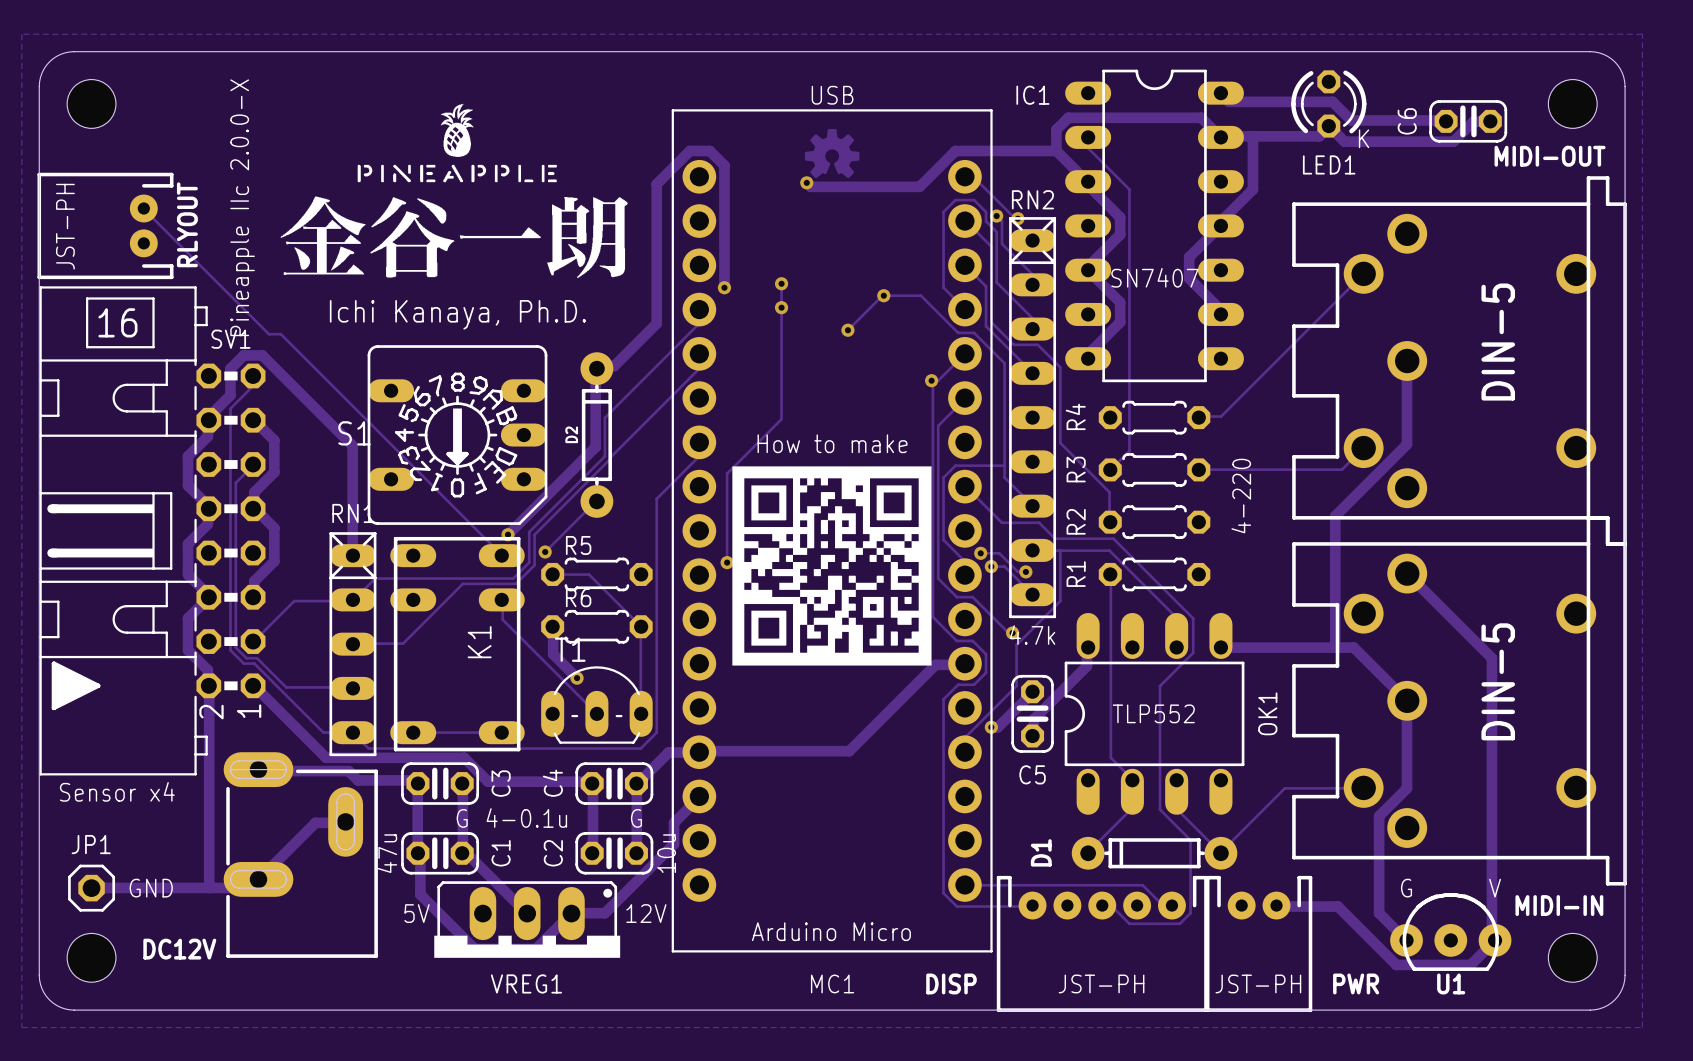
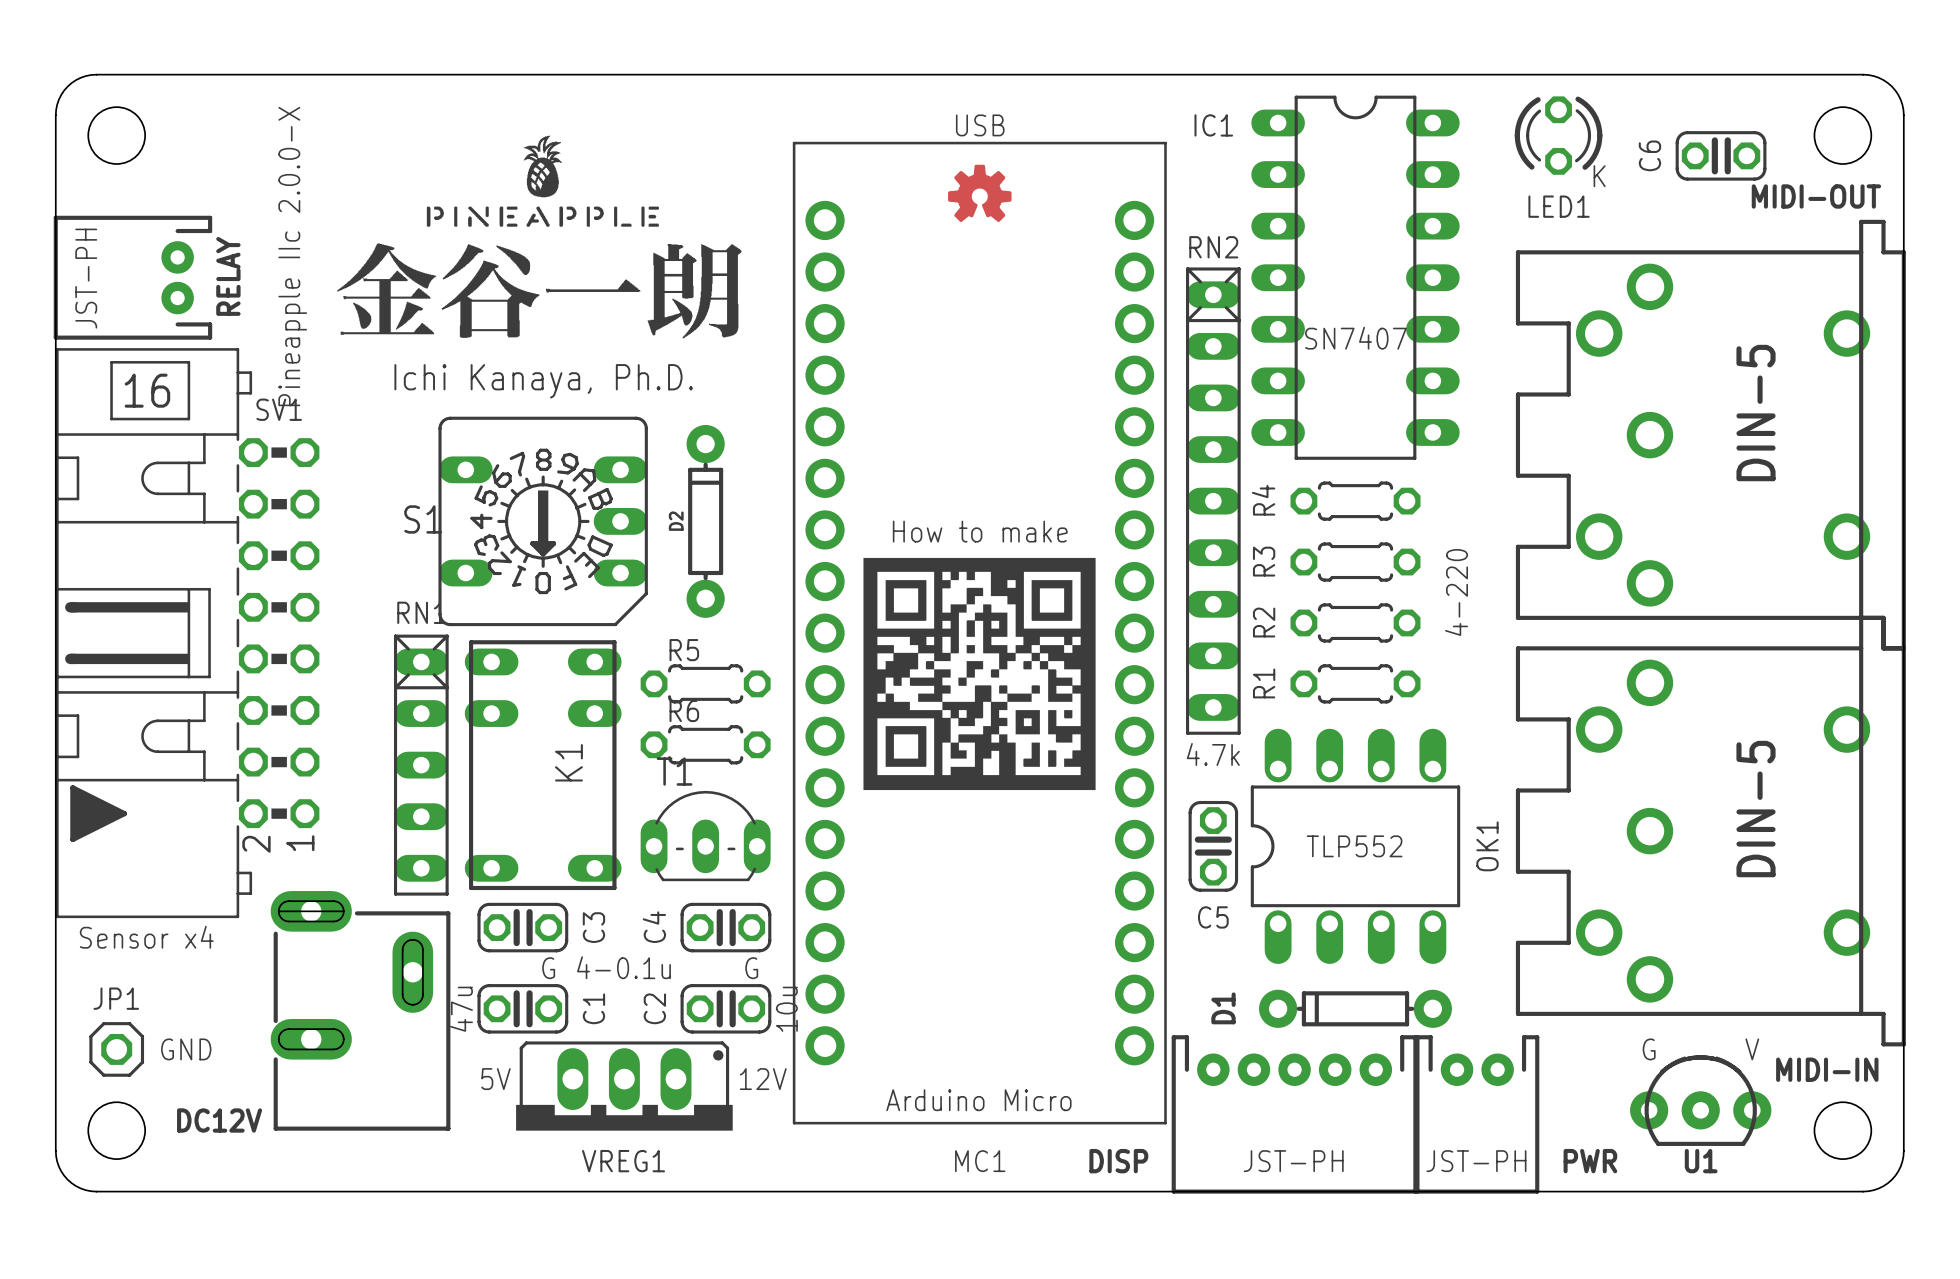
zone outline: (21, 34) (1642, 34) (1642, 1027) (21, 1027) (21, 34) -> none
track: (1220, 93) (1229, 101) (1332, 101) (1351, 120) (1446, 121) -> none
track: (1490, 121) (1473, 121) (1453, 141) (1344, 141) (1328, 126) (1319, 136) (1220, 137) (1201, 117) (1068, 117) (1056, 129) (1056, 150) -> none
track: (1252, 136) (1252, 189) (1223, 218) (1220, 225) (1189, 257) (1189, 278) (1219, 308) (1220, 314) -> none
track: (1088, 137) (1088, 148) (1129, 189) (1129, 451) (1110, 469) -> none
track: (1056, 150) (955, 150) (919, 186) (810, 186) (806, 182) -> none
track: (1056, 150) (1088, 181) (1089, 186) (1120, 217) (1120, 234) (1089, 265) (1088, 270) -> none
track: (964, 176) (974, 177) (1015, 218) (1017, 218) -> none
via: (806, 182) -> none
track: (143, 208) (269, 334) (280, 334) (501, 555) -> none
track: (996, 216) (1001, 221) (1001, 243) (1032, 274) (1032, 284) -> none
via: (996, 216) -> none
via: (1017, 218) -> none
track: (964, 221) (991, 246) (991, 322) (1013, 344) (1037, 344) (1060, 367) (1060, 443) (1109, 492) (1110, 522) -> none
RLYOUT name: RLYOUT (187, 224) -> RELAY (228, 276)
track: (964, 265) (986, 286) (986, 326) (1032, 373) -> none
track: (1088, 270) (1120, 302) (1120, 322) (1088, 354) (1088, 358) -> none
track: (1363, 273) (1221, 416) (1198, 417) -> none
track: (781, 283) (781, 419) (727, 473) (727, 562) -> none
via: (781, 283) -> none
track: (724, 287) (724, 165) (709, 150) (689, 150) (656, 184) (656, 323) (614, 366) (600, 366) (595, 368) (595, 447) (508, 534) -> none
via: (724, 287) -> none
via: (883, 295) -> none
via: (781, 307) -> none
track: (699, 309) (699, 323) (604, 417) (604, 456) (529, 532) (529, 562) (513, 578) (375, 578) (352, 601) (294, 601) (253, 641) -> none
track: (964, 309) (943, 287) (943, 212) (955, 200) (974, 200) (986, 212) (986, 221) (996, 231) (996, 282) (1032, 318) (1032, 328) -> none
track: (847, 330) (882, 295) (920, 295) (958, 332) (974, 332) (1004, 363) (1004, 477) (1032, 506) -> none
via: (847, 330) -> none
track: (699, 354) (699, 368) (534, 534) (534, 565) (515, 583) (462, 583) (403, 643) (352, 644) -> none
track: (964, 354) (938, 380) (931, 380) -> none
track: (1407, 360) (1406, 444) (1335, 516) (1335, 647) -> none
track: (253, 375) (253, 386) (230, 408) (230, 650) (243, 663) (254, 663) (323, 732) (352, 732) -> none
via: (931, 380) -> none
track: (932, 380) (932, 617) (956, 640) (972, 640) (986, 654) (986, 672) (974, 684) (958, 684) (943, 699) (943, 893) (956, 906) (1032, 905) -> none
track: (964, 398) (938, 425) (938, 578) (956, 597) (972, 597) (1008, 632) (1012, 632) -> none
track: (253, 420) (274, 440) (274, 472) (254, 492) (253, 508) (274, 528) (274, 561) (254, 581) (253, 597) -> none
track: (699, 442) (699, 456) (656, 498) (656, 732) (640, 748) (368, 748) (352, 732) -> none
track: (1363, 448) (1341, 469) (1198, 469) -> none
track: (253, 464) (235, 482) (235, 647) (246, 658) (257, 658) (286, 687) (352, 688) -> none
track: (1004, 465) (955, 465) (943, 477) (943, 540) (964, 561) (964, 575) -> none
track: (964, 486) (1001, 522) (1039, 522) (1055, 538) (1113, 538) (1193, 618) (1193, 652) (1159, 686) (1159, 809) (1190, 840) (1190, 913) (1179, 923) (1129, 923) (1112, 906) (1102, 905) -> none
track: (596, 501) (545, 551) -> none
via: (508, 534) -> none
track: (1032, 550) (1109, 550) (1175, 617) (1176, 647) -> none
track: (1060, 550) (1060, 601) (1016, 644) (1016, 686) (966, 736) (964, 752) -> none
via: (545, 551) -> none
track: (980, 553) (999, 553) (1017, 571) (1025, 571) -> none
via: (980, 553) -> none
track: (352, 555) (352, 445) (262, 355) (243, 355) (230, 368) (230, 395) (210, 415) (207, 420) (207, 436) (188, 456) (188, 485) (208, 508) (207, 524) (188, 544) (188, 574) (208, 597) (188, 618) (188, 650) (207, 670) (209, 887) -> none
via: (727, 562) -> none
track: (991, 566) (1004, 566) (1032, 594) -> none
via: (991, 566) -> none
via: (1025, 571) -> none
track: (1407, 573) (1491, 658) (1491, 935) (1495, 940) (1470, 964) (1396, 964) (1337, 906) (1276, 905) -> none
track: (552, 574) (589, 574) (641, 626) (641, 713) -> none
track: (1110, 574) (1110, 757) (1132, 780) -> none
track: (501, 599) (502, 619) (596, 713) -> none
track: (552, 626) (553, 654) (577, 678) -> none
via: (1012, 632) -> none
track: (1088, 647) (1086, 666) (1033, 719) (1032, 735) -> none
track: (1221, 647) (1353, 647) (1406, 700) -> none
track: (964, 663) (935, 664) (849, 751) (699, 752) -> none
via: (577, 678) -> none
track: (253, 685) (326, 757) (464, 757) (488, 781) (587, 781) (592, 783) (592, 853) -> none
track: (1032, 691) (997, 727) (991, 727) -> none
track: (1407, 700) (1406, 788) (1379, 816) (1379, 913) (1406, 940) -> none
via: (991, 727) -> none
track: (413, 732) (501, 732) -> none
track: (699, 752) (668, 752) (636, 783) (636, 853) -> none
track: (258, 769) (348, 771) (357, 780) (413, 780) (417, 783) (417, 852) (420, 857) (420, 894) (474, 949) (535, 949) (571, 913) (604, 913) (673, 844) (673, 822) (699, 796) -> none
track: (1132, 780) (1132, 808) (1088, 853) -> none
track: (1176, 780) (1177, 809) (1220, 853) (1284, 788) (1363, 787) -> none
track: (462, 783) (462, 853) (466, 853) (527, 913) -> none
track: (345, 821) (315, 822) (250, 887) (91, 888) -> none
track: (964, 884) (1142, 885) (1162, 905) (1171, 905) -> none

